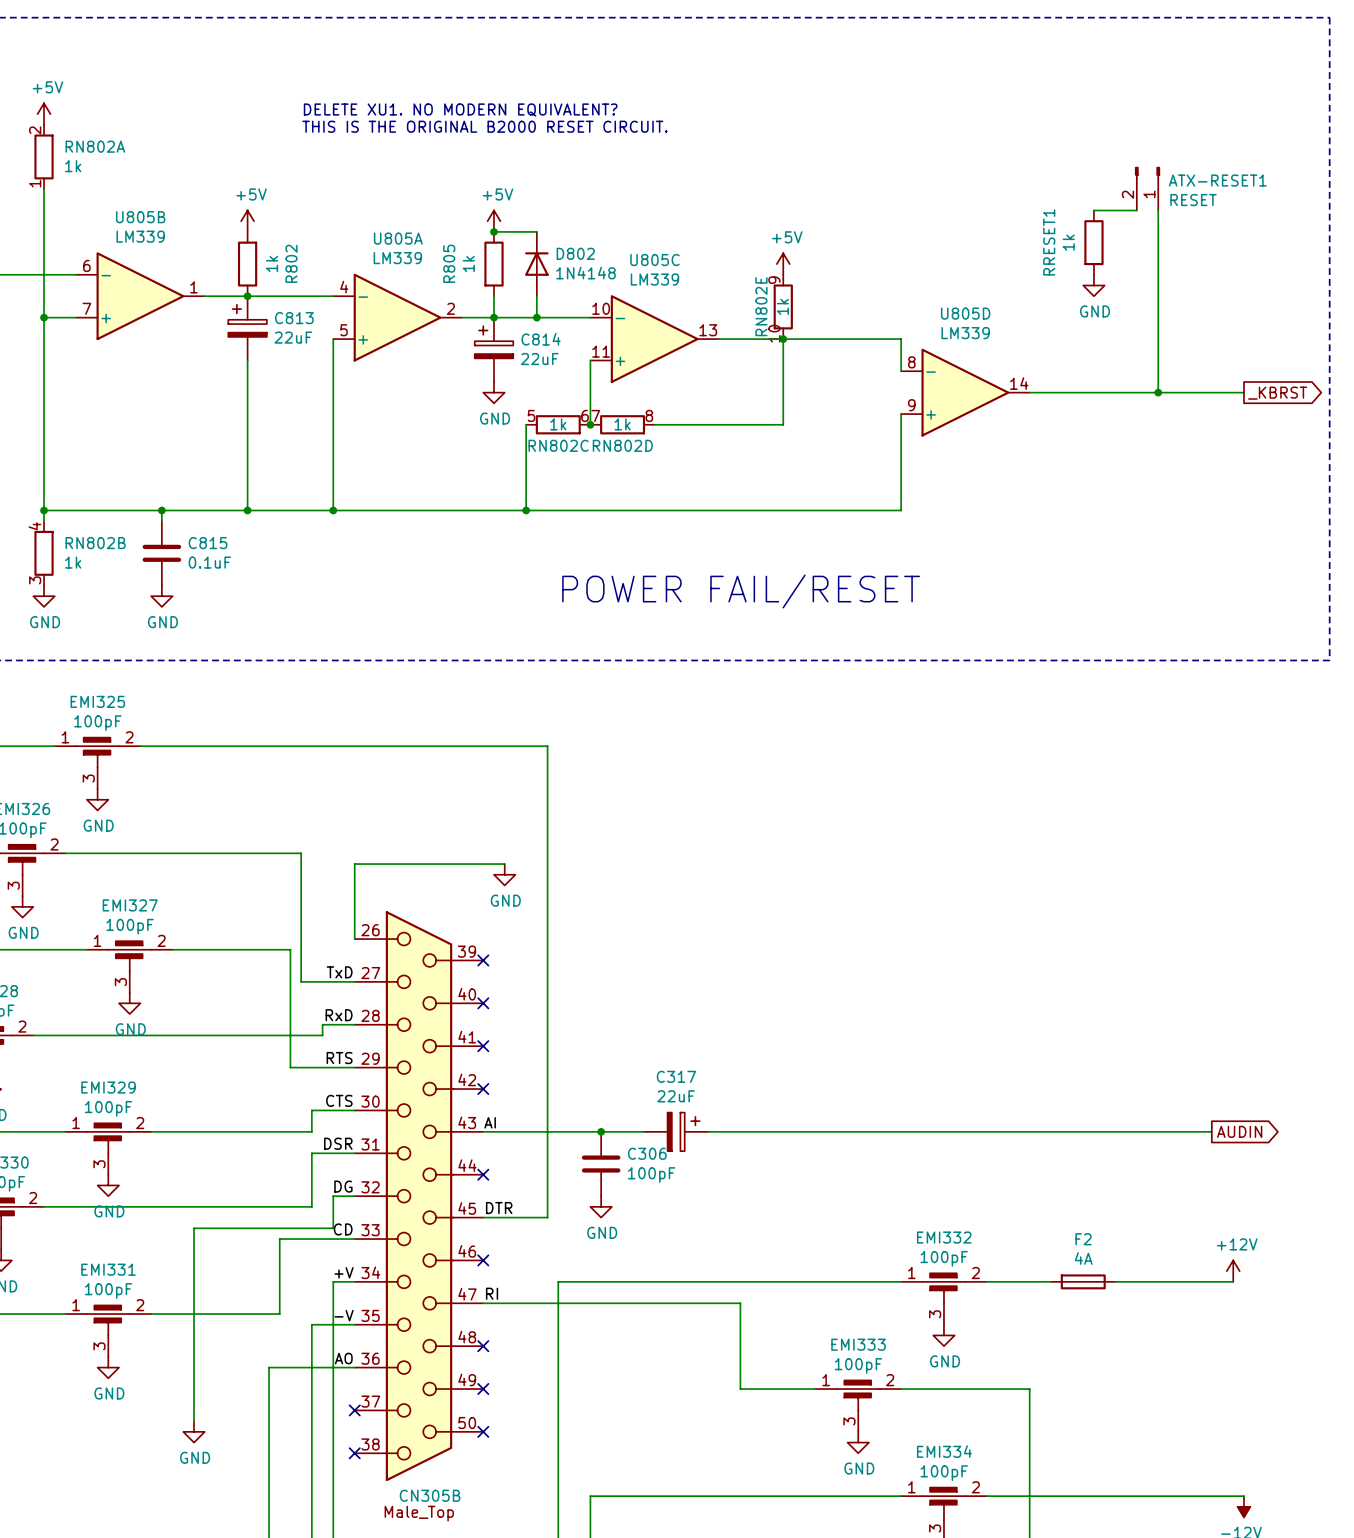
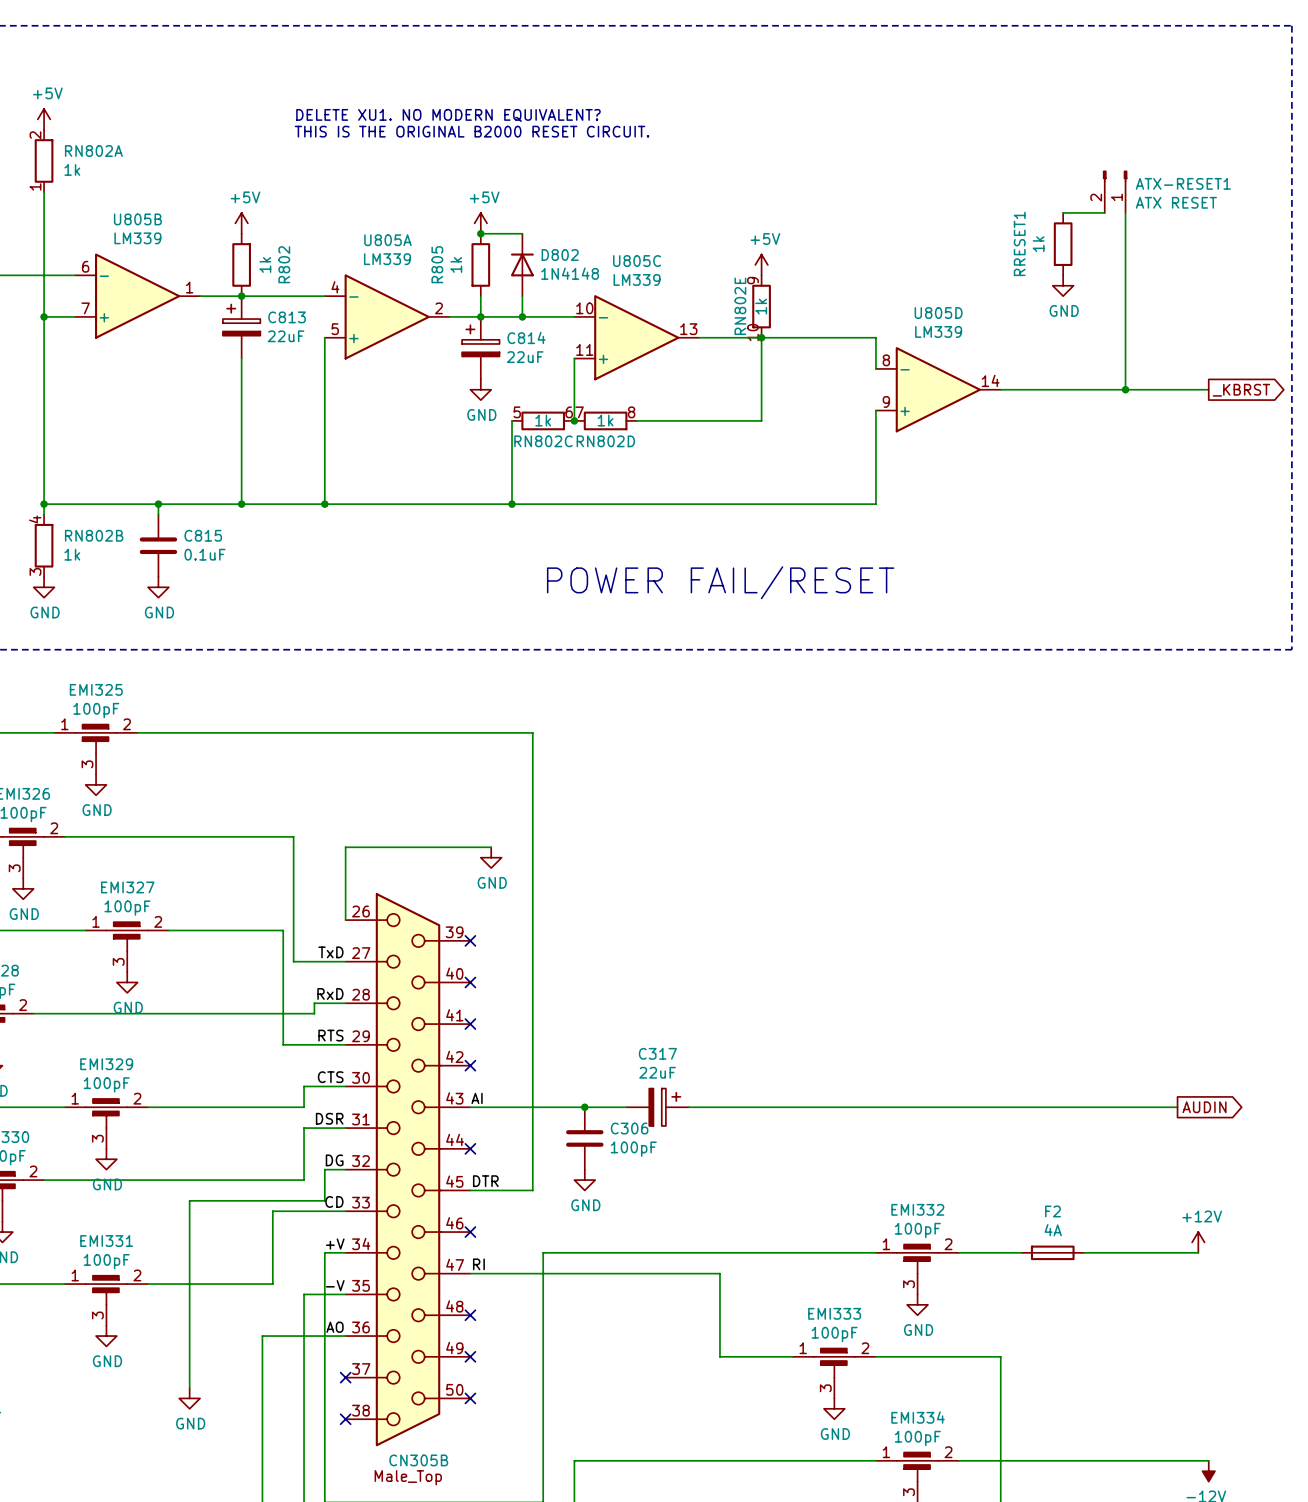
ATX-RESET1 value: RESET (1193, 200) -> ATX RESET (1176, 202)

